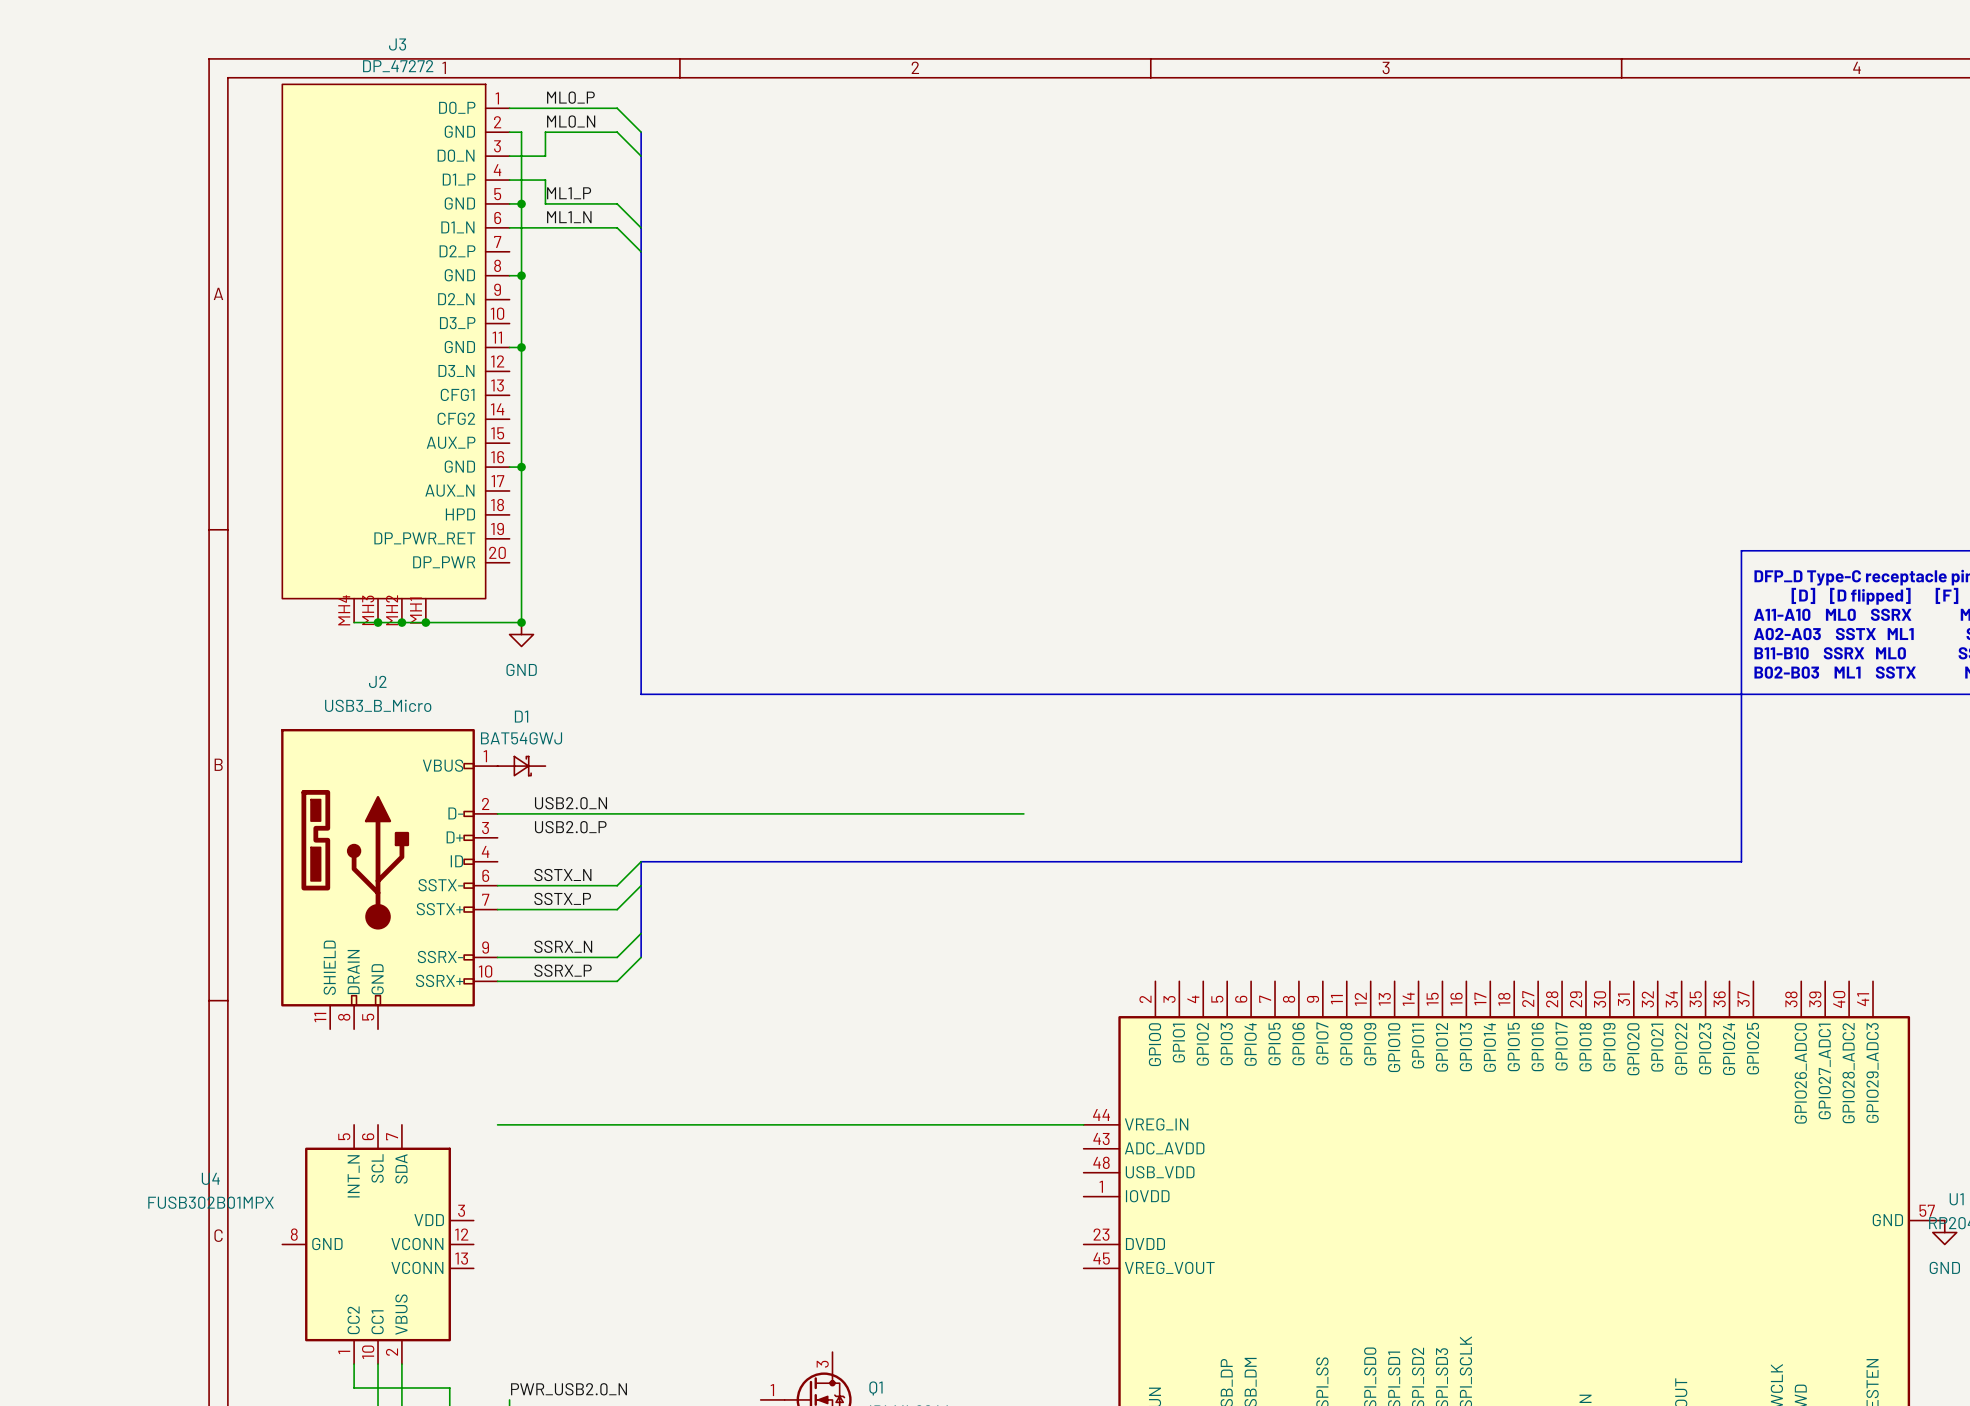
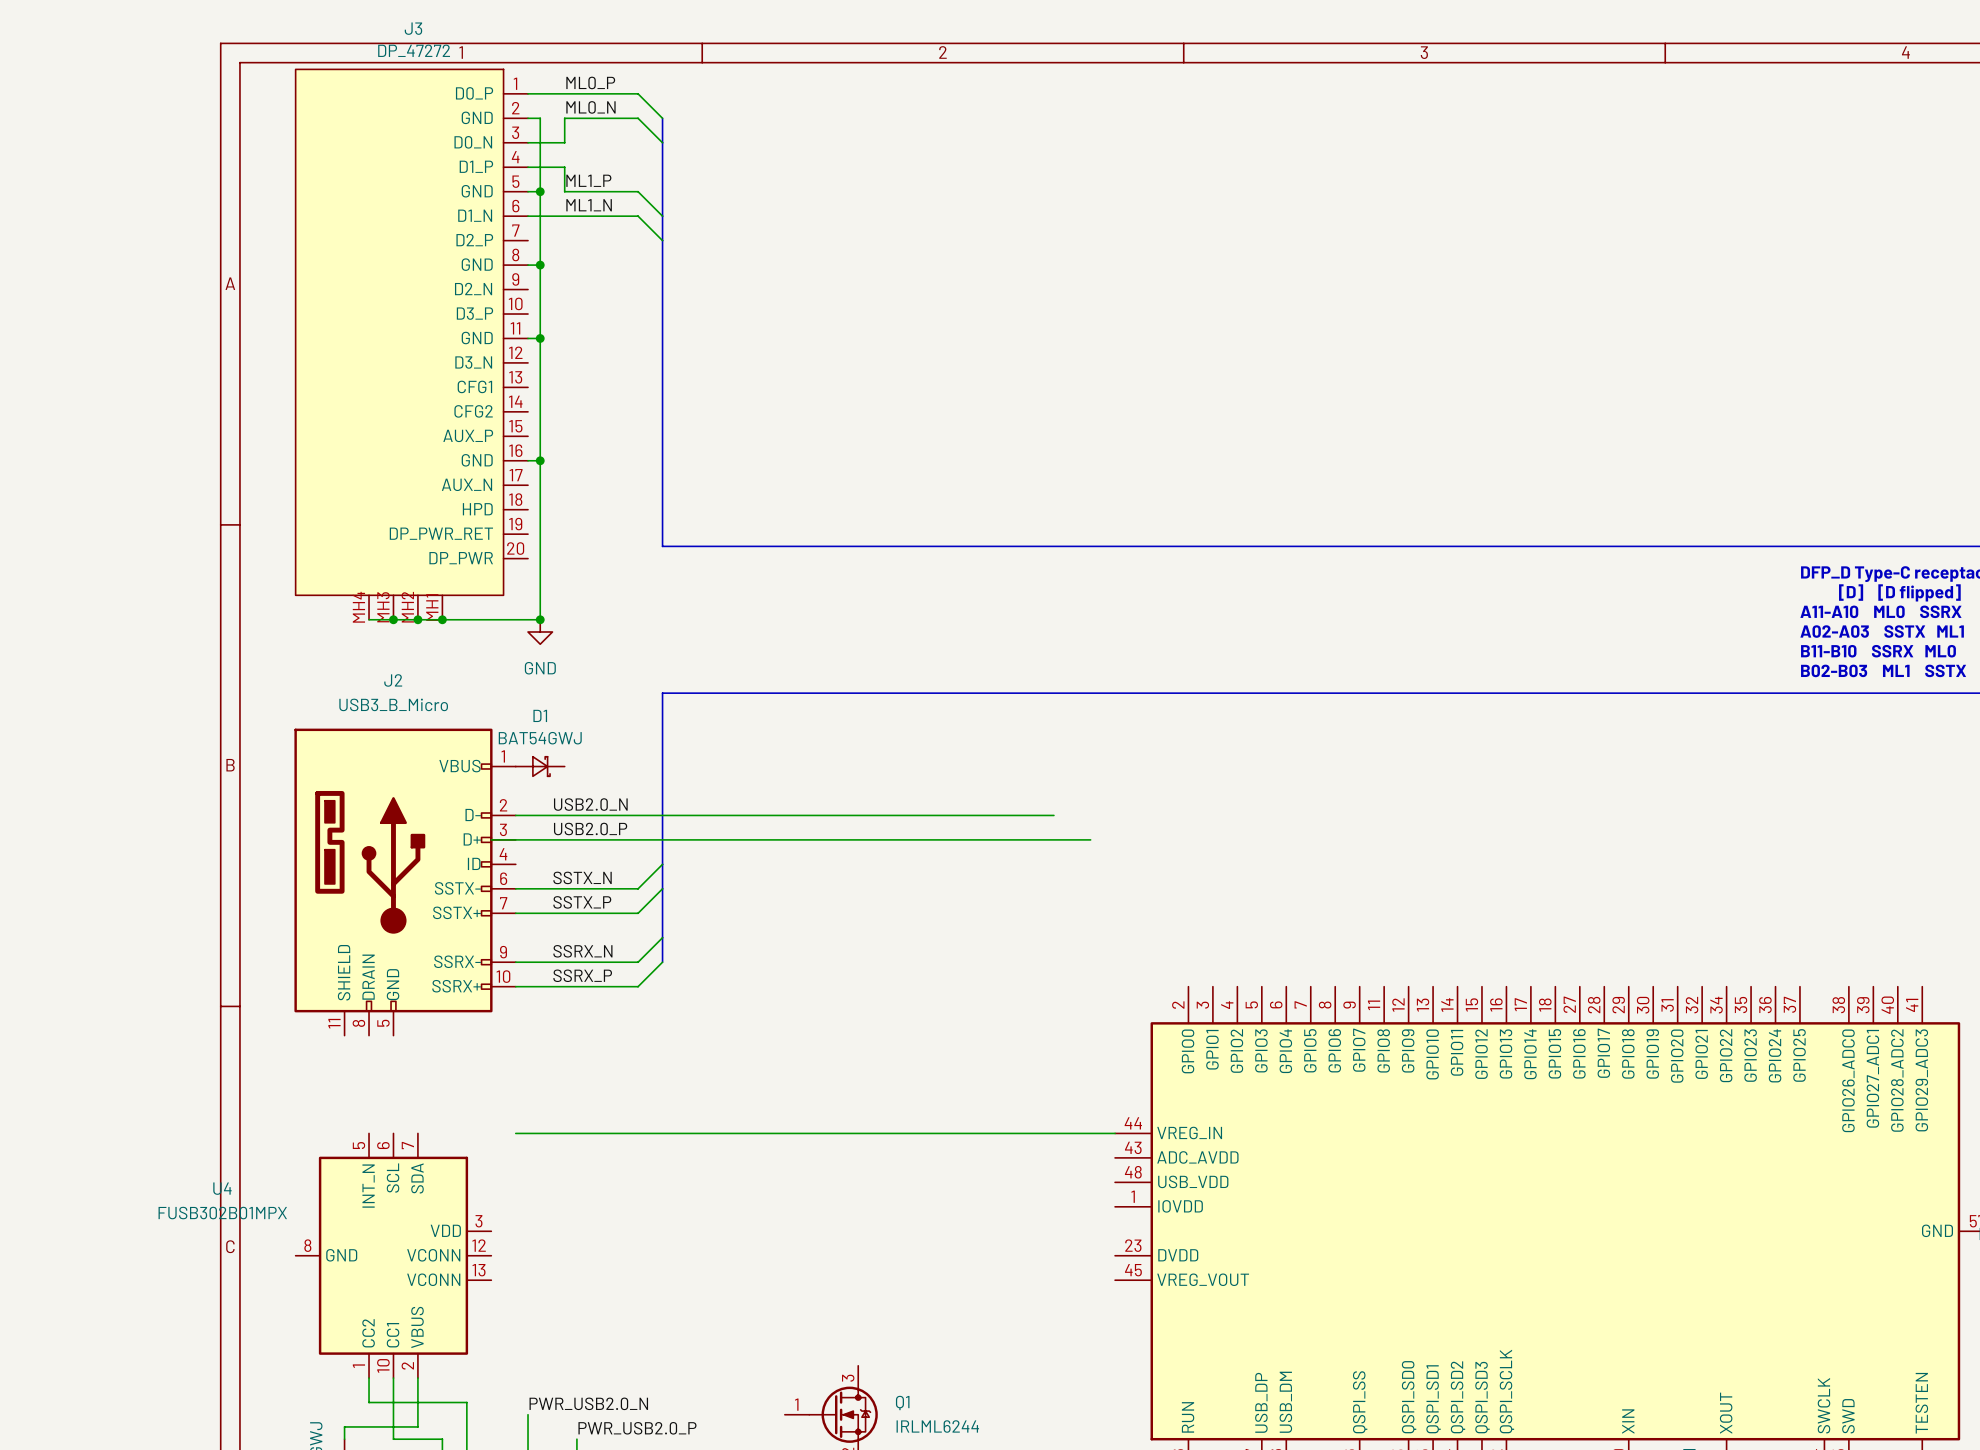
bus: (641, 550) (641, 694) -> (662, 864) (662, 693)
bus: (1741, 550) (1741, 861) (641, 861) -> (1787, 546) (662, 546)
wire: none -> (491, 839) (1090, 839)

